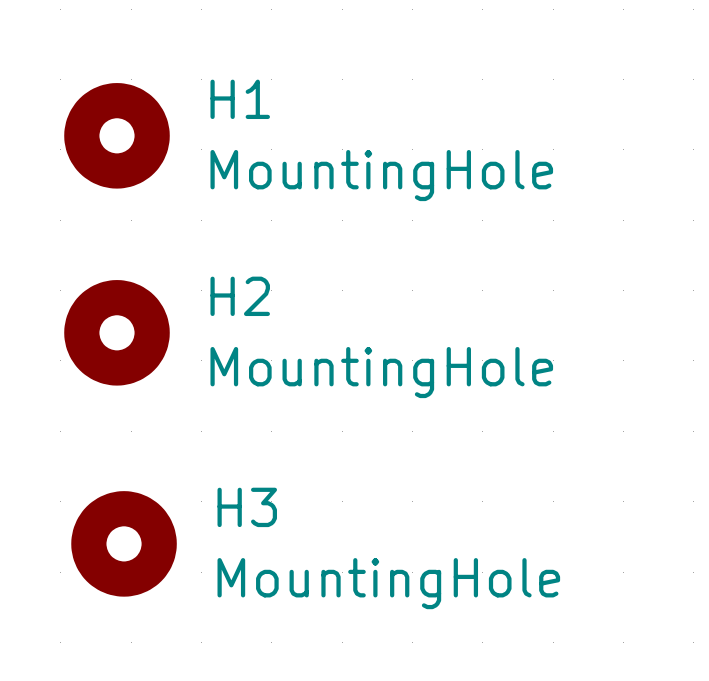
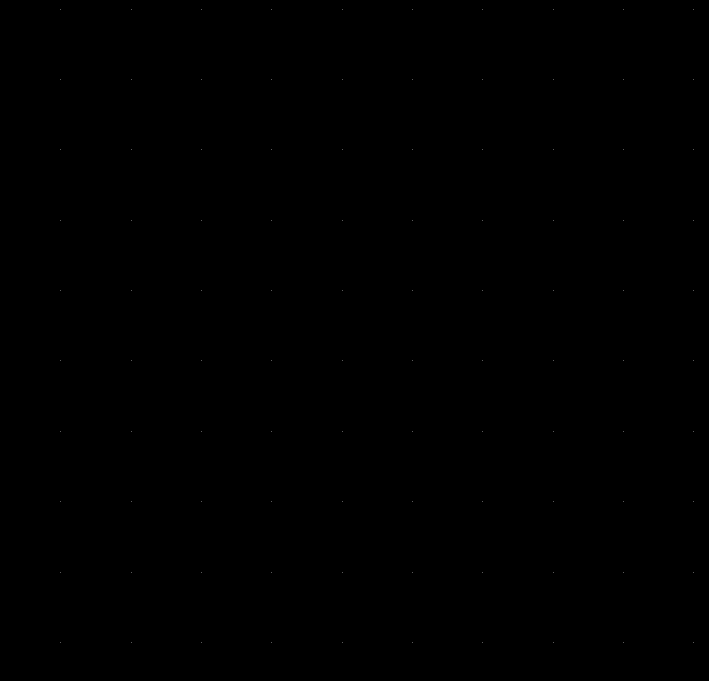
H1: MountingHole (116, 135) -> none
H2: MountingHole (116, 332) -> none
H3: MountingHole (124, 543) -> none

